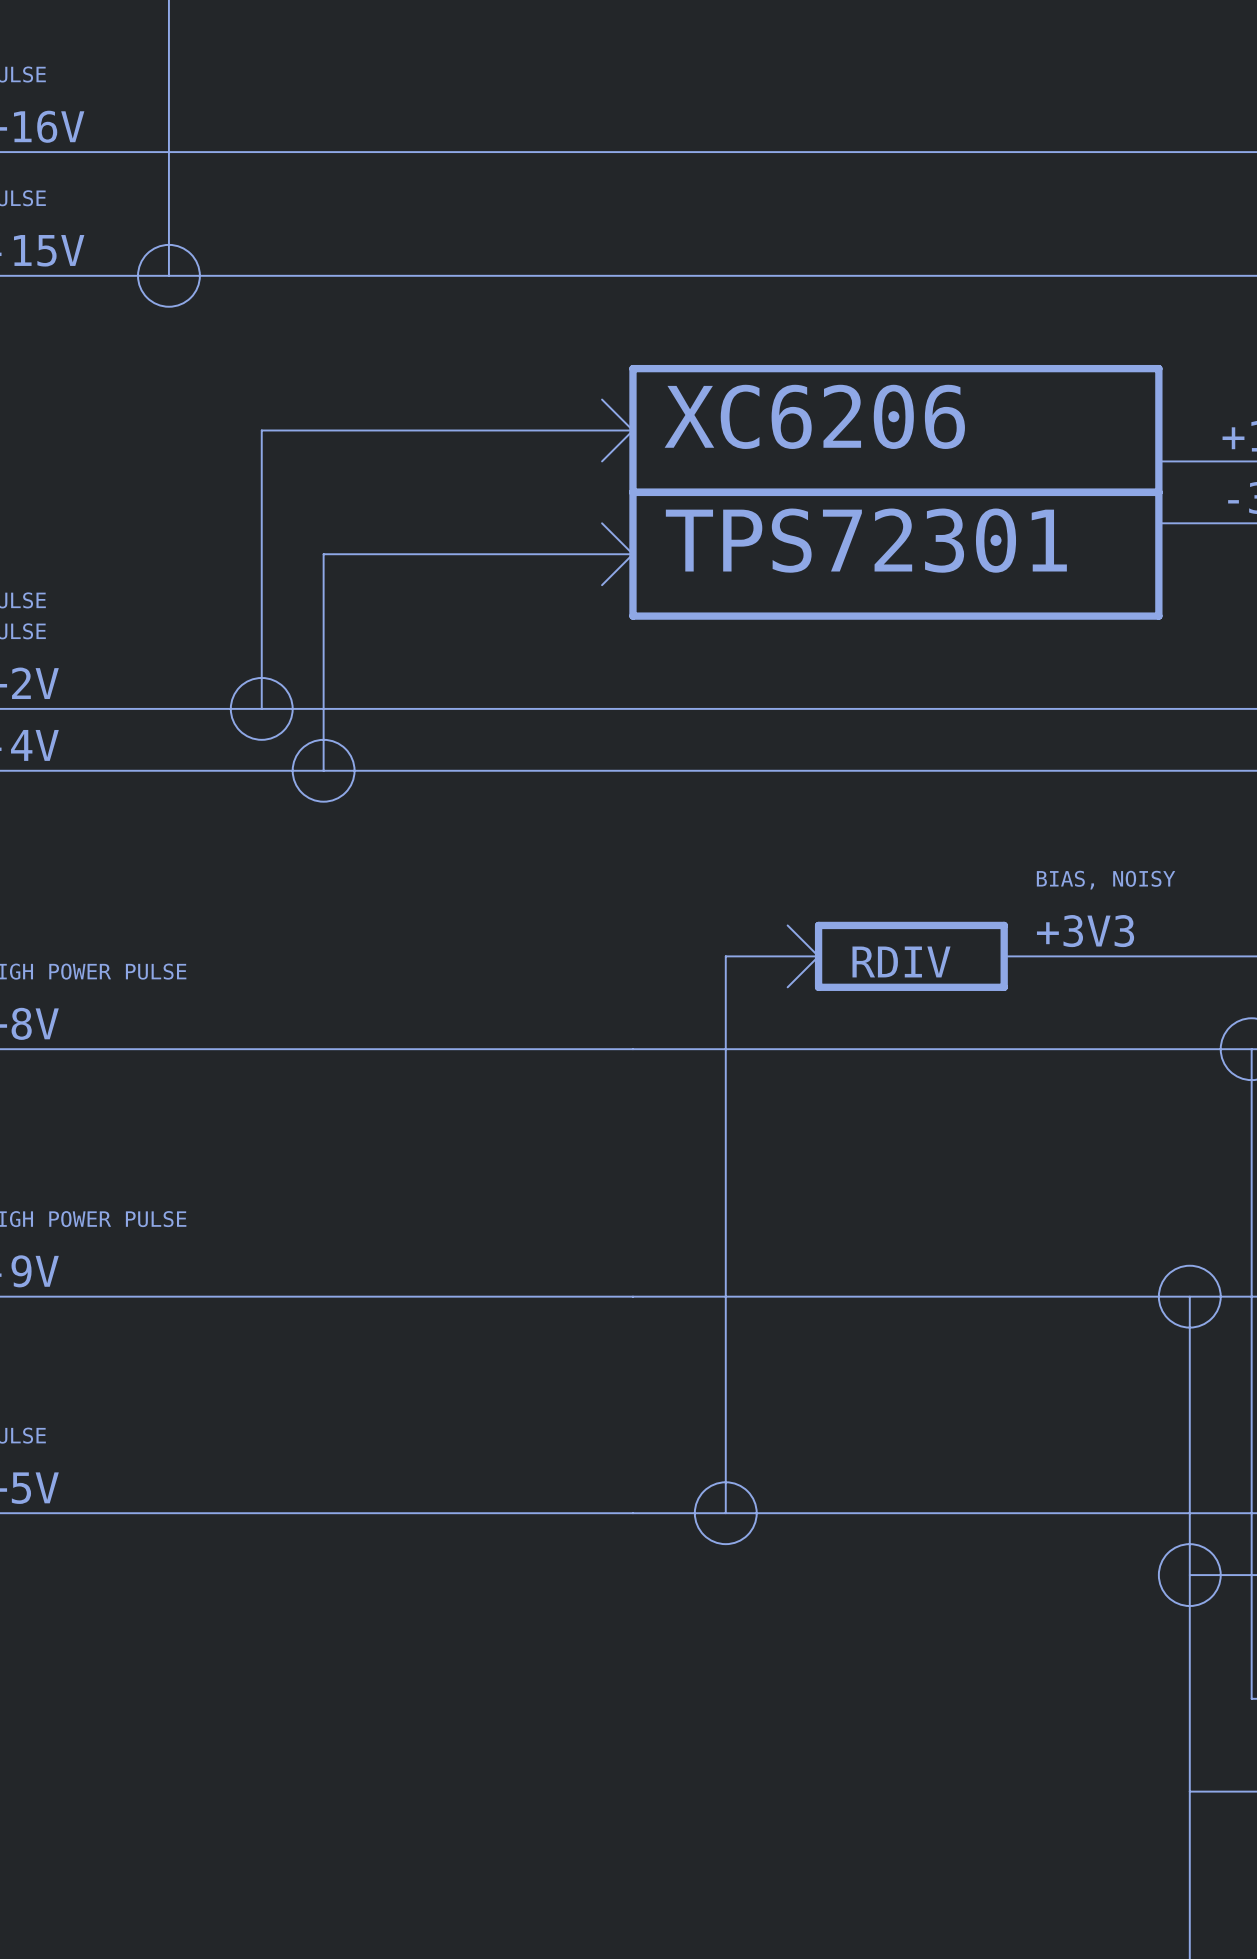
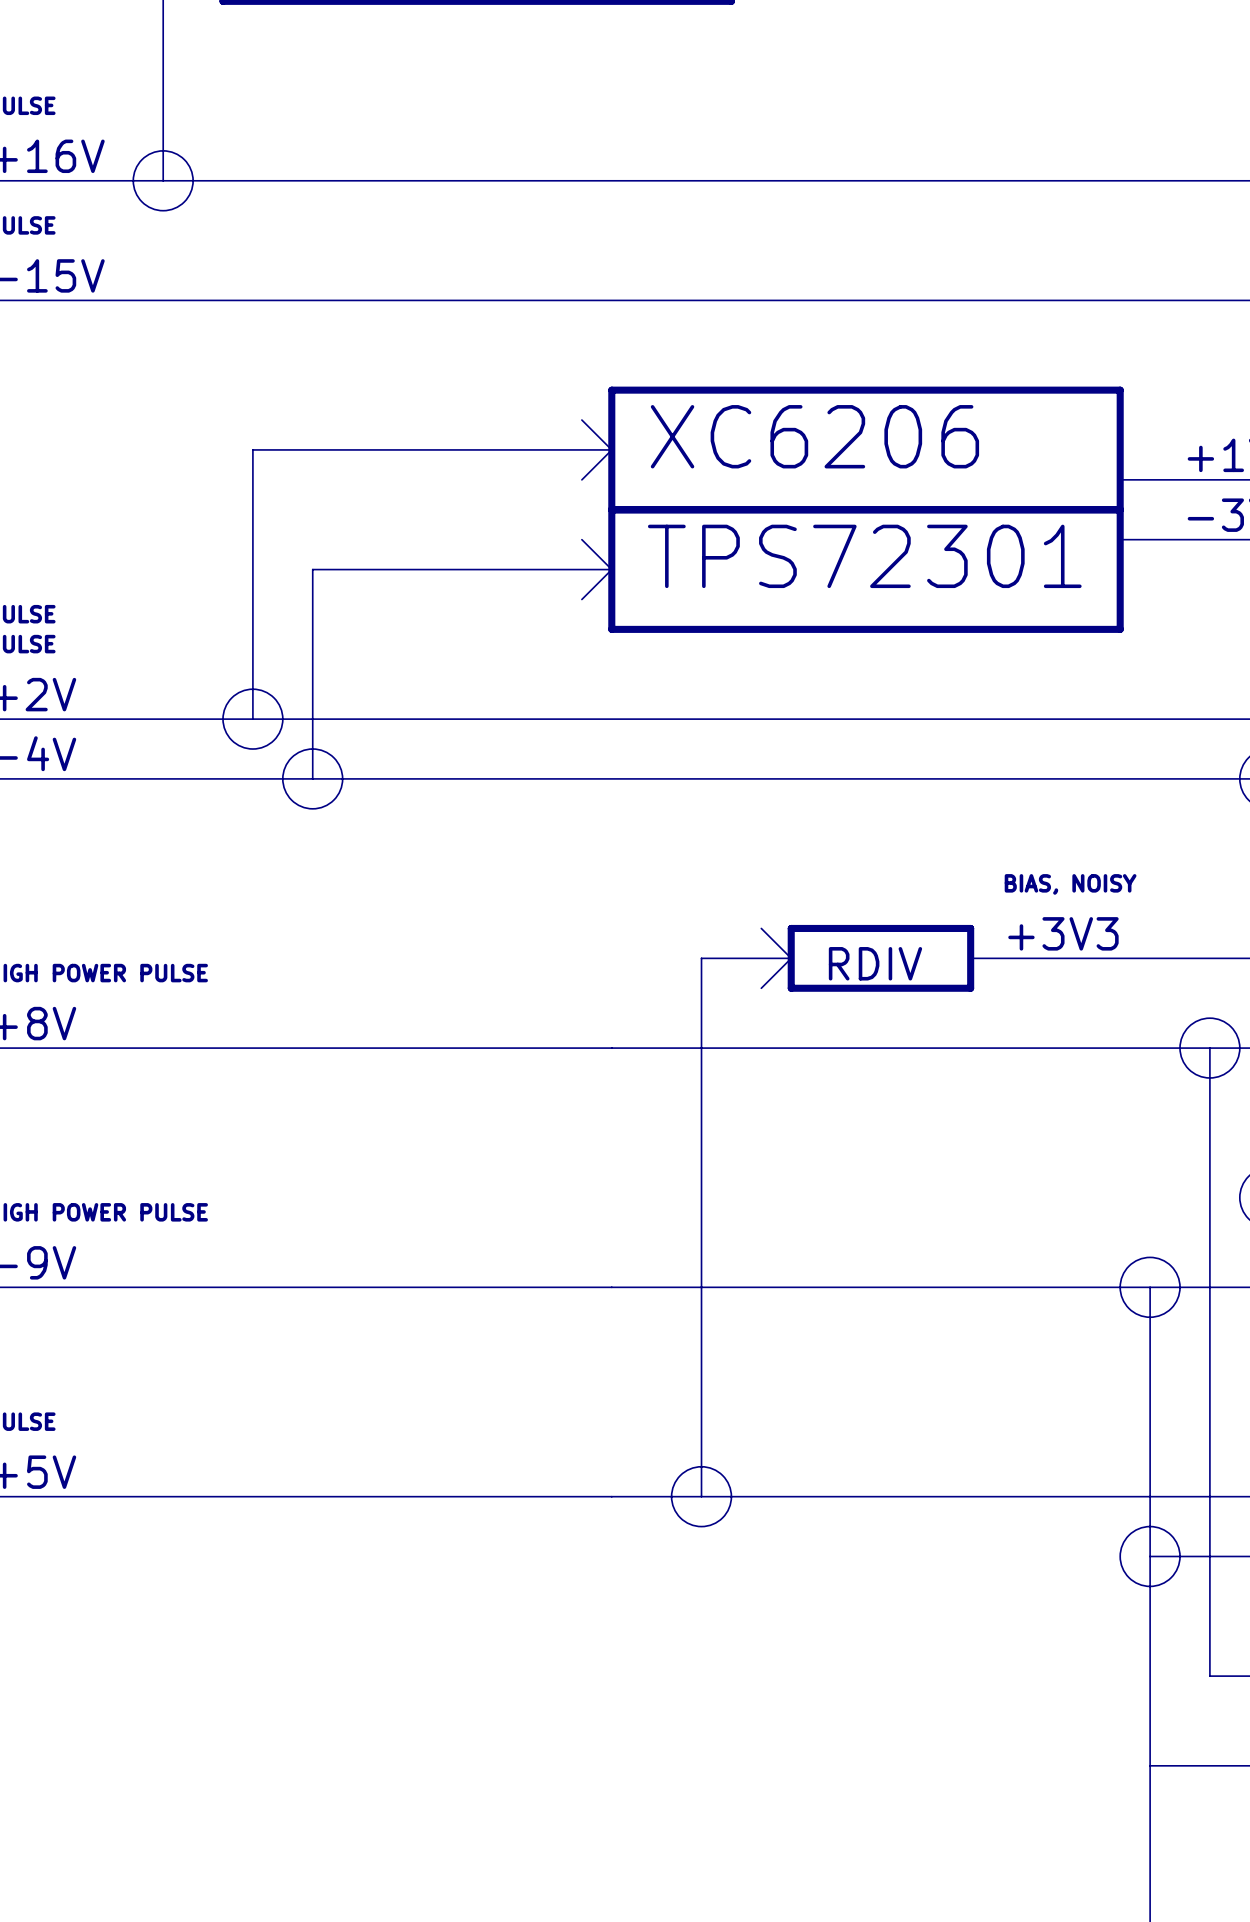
line: (168, 152) (168, 275) -> none
drawing position: (168, 275) -> (163, 180)

